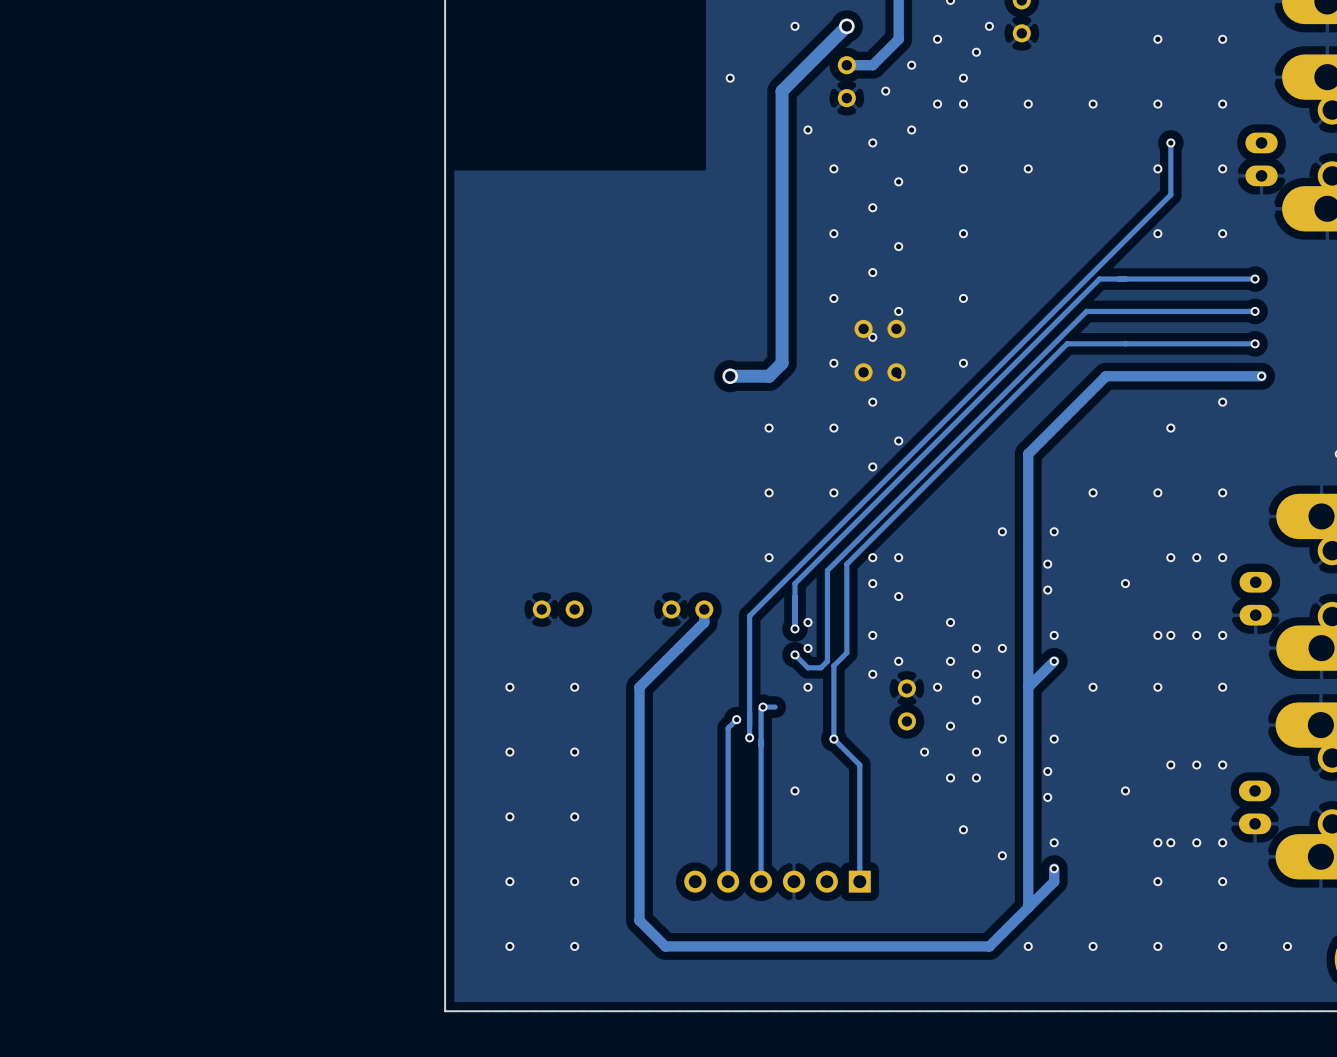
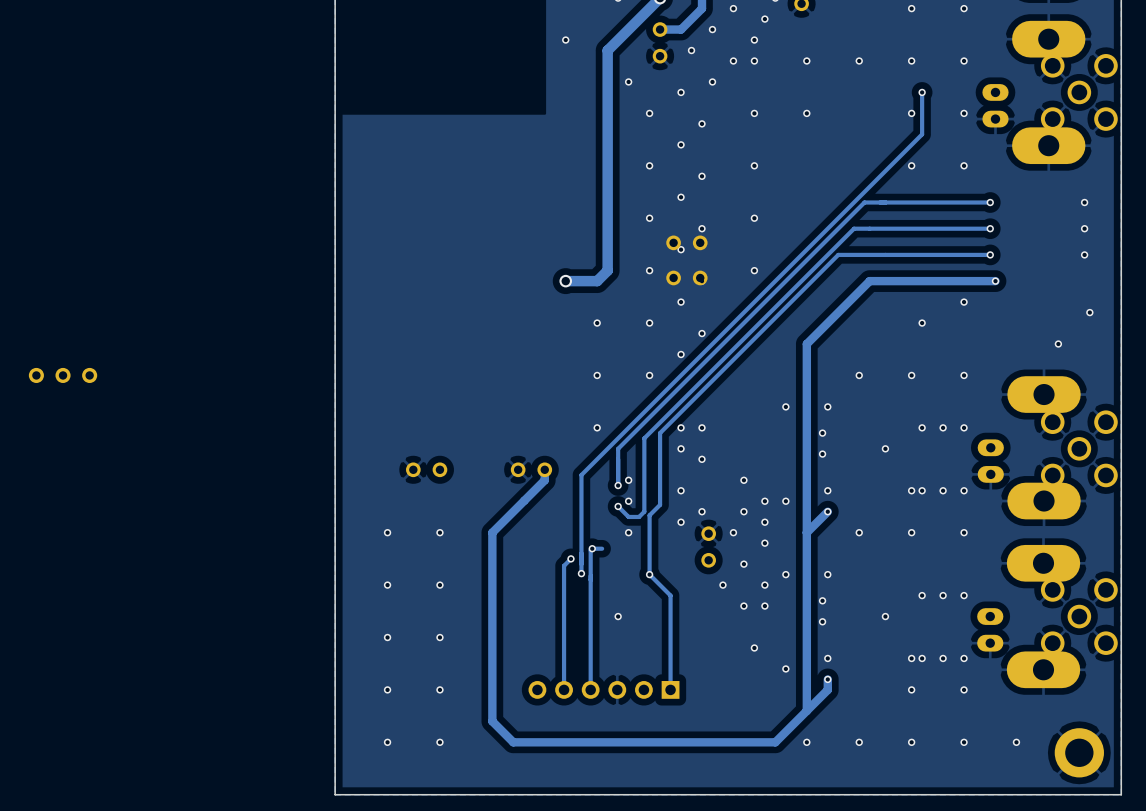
part: none -> (63, 375)

